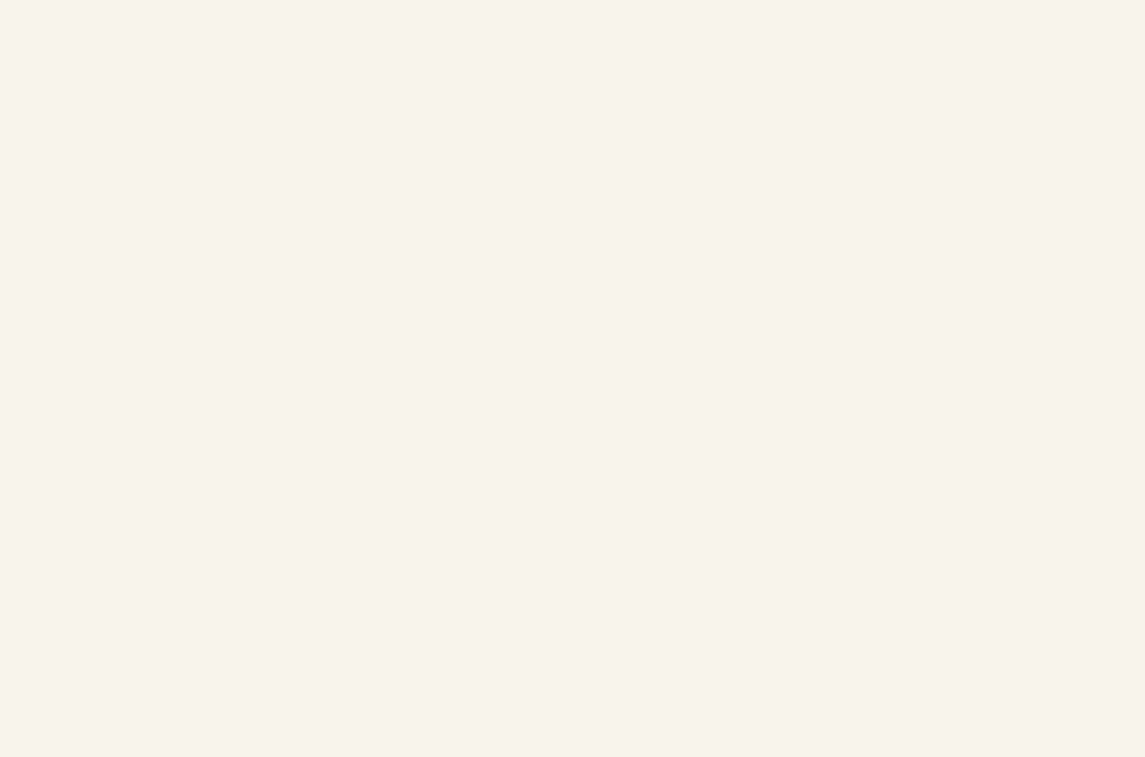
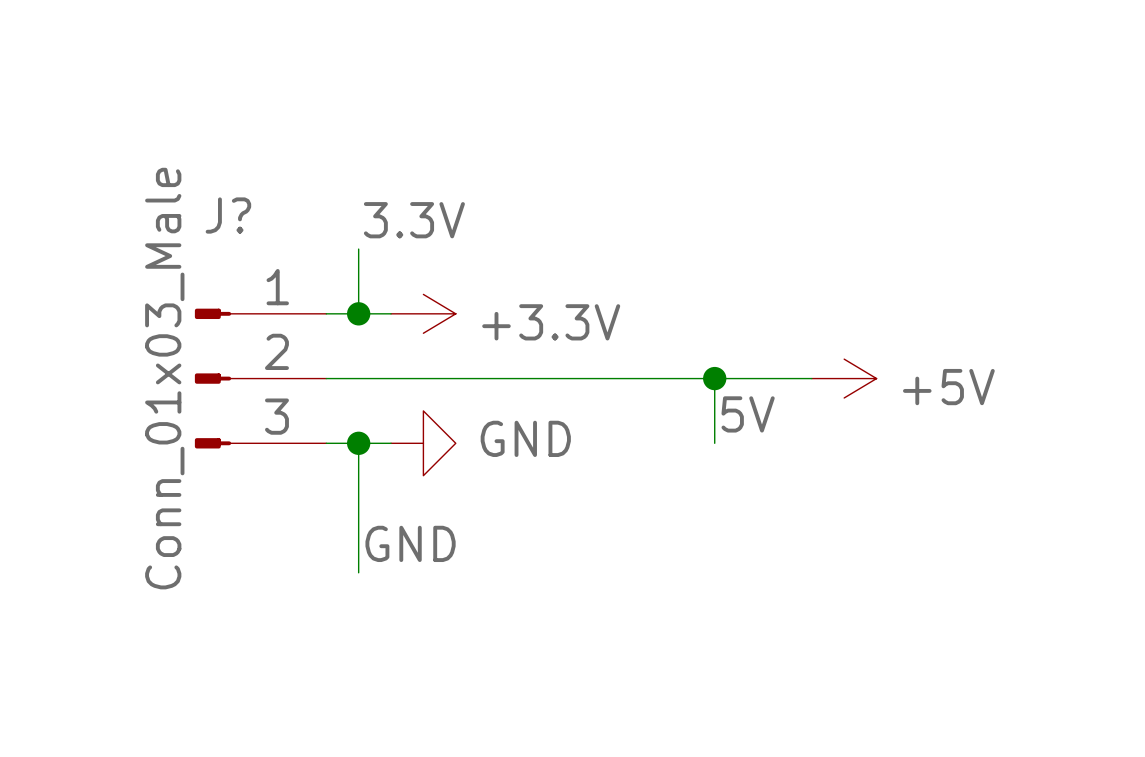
label: none -> 3.3V (414, 220)
wire: none -> (358, 249) (358, 313)
wire: none -> (326, 313) (391, 313)
junction: none -> (358, 313)
power symbol: none -> +3.3V (423, 313)
J?: none -> Conn_01x03_Male (260, 378)
wire: none -> (326, 378) (811, 378)
wire: none -> (714, 378) (714, 443)
junction: none -> (714, 378)
power symbol: none -> +5V (844, 378)
label: none -> 5V (748, 414)
wire: none -> (326, 443) (391, 443)
wire: none -> (358, 443) (358, 572)
junction: none -> (358, 443)
power symbol: none -> GND (423, 443)
label: none -> GND (410, 543)

